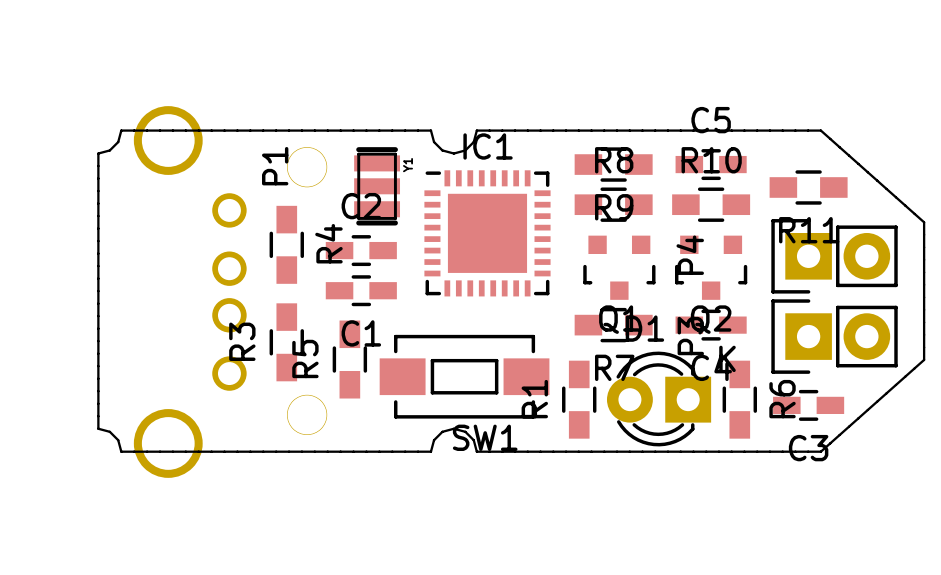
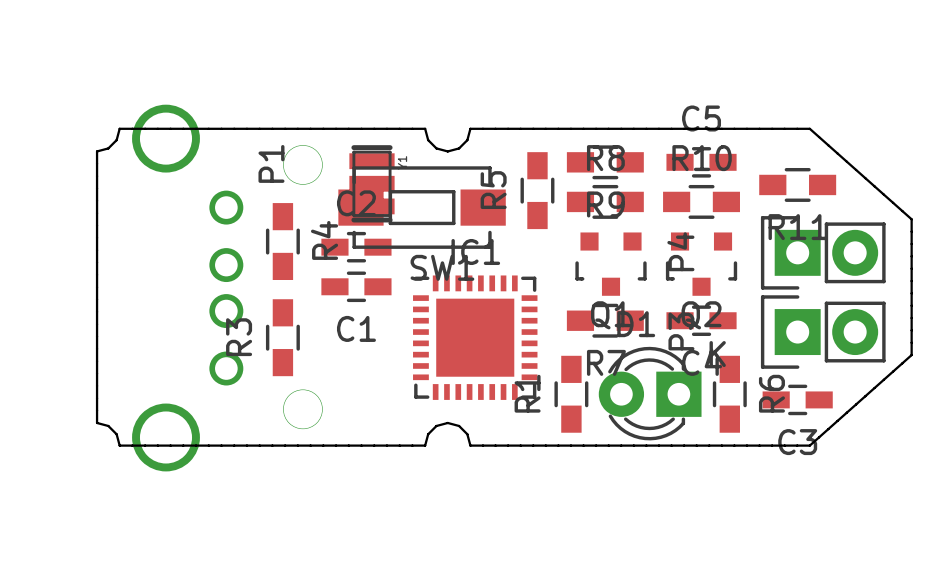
IC1 position: (487, 233) -> (475, 337)
R5 position: (349, 359) -> (537, 190)
SW1 position: (464, 376) -> (422, 207)

